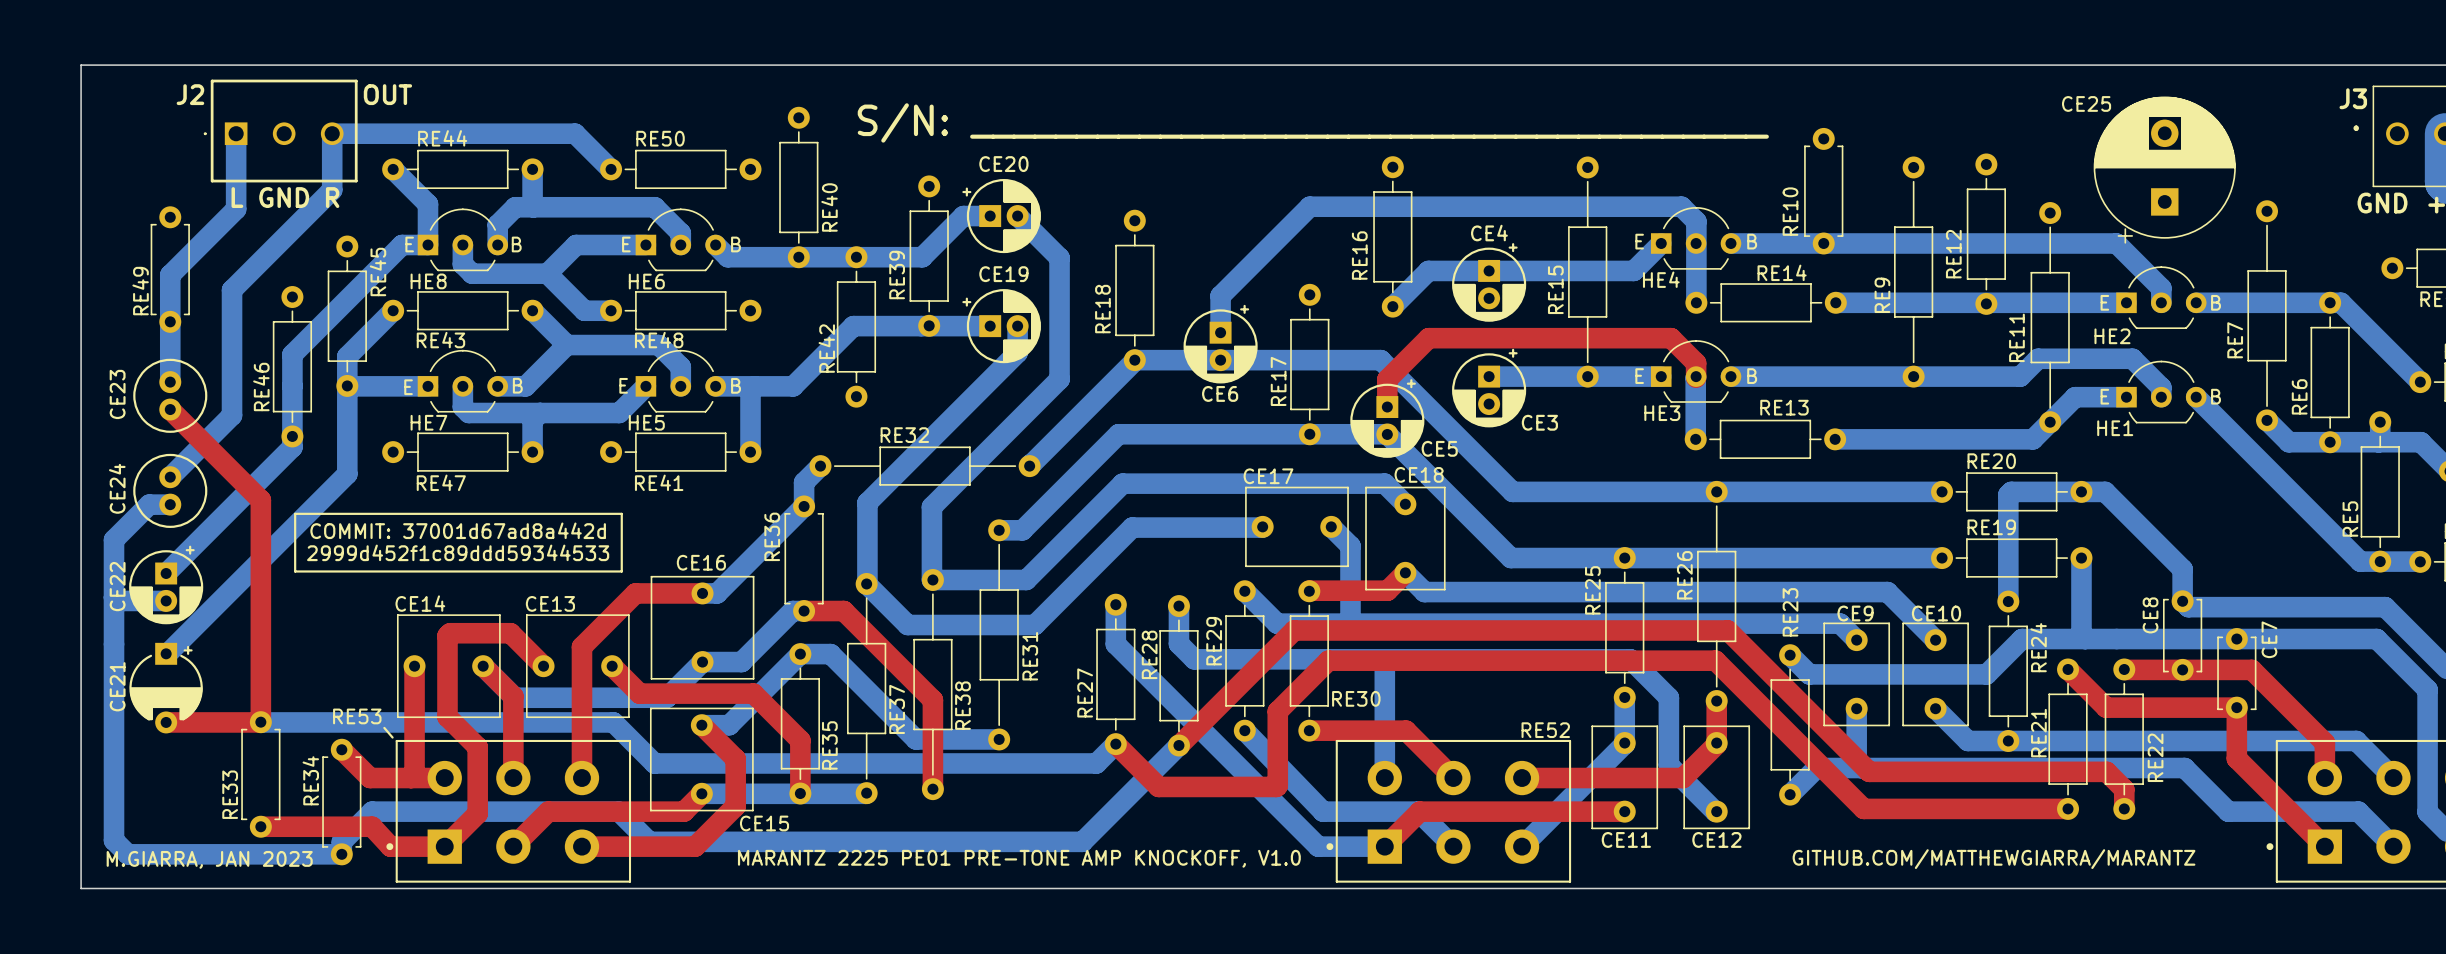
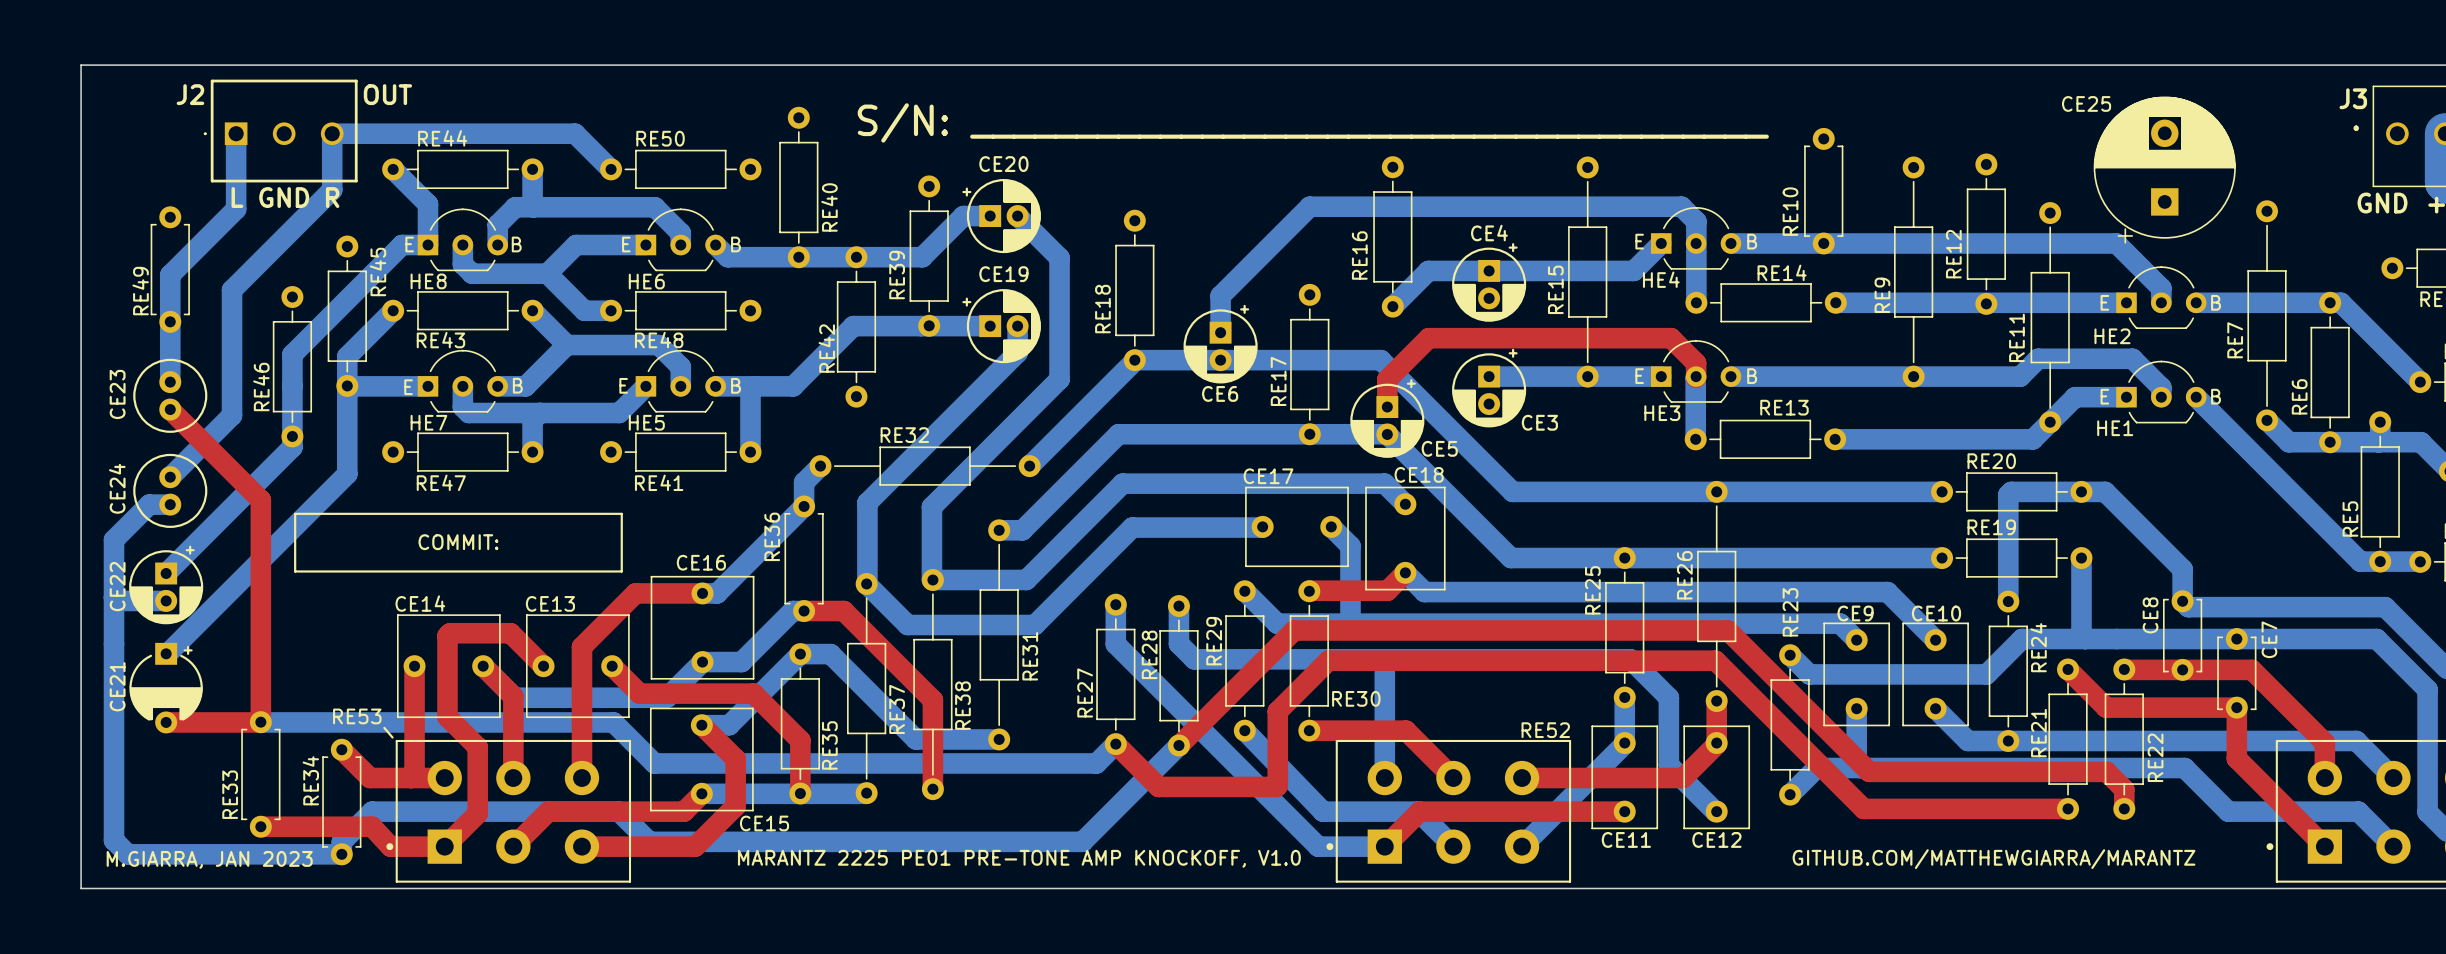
text: COMMIT: 37001d67ad8a442d (458, 530) -> none
text: none -> COMMIT: (458, 542)
text: 2999d452f1c89ddd59344533 (458, 552) -> none

